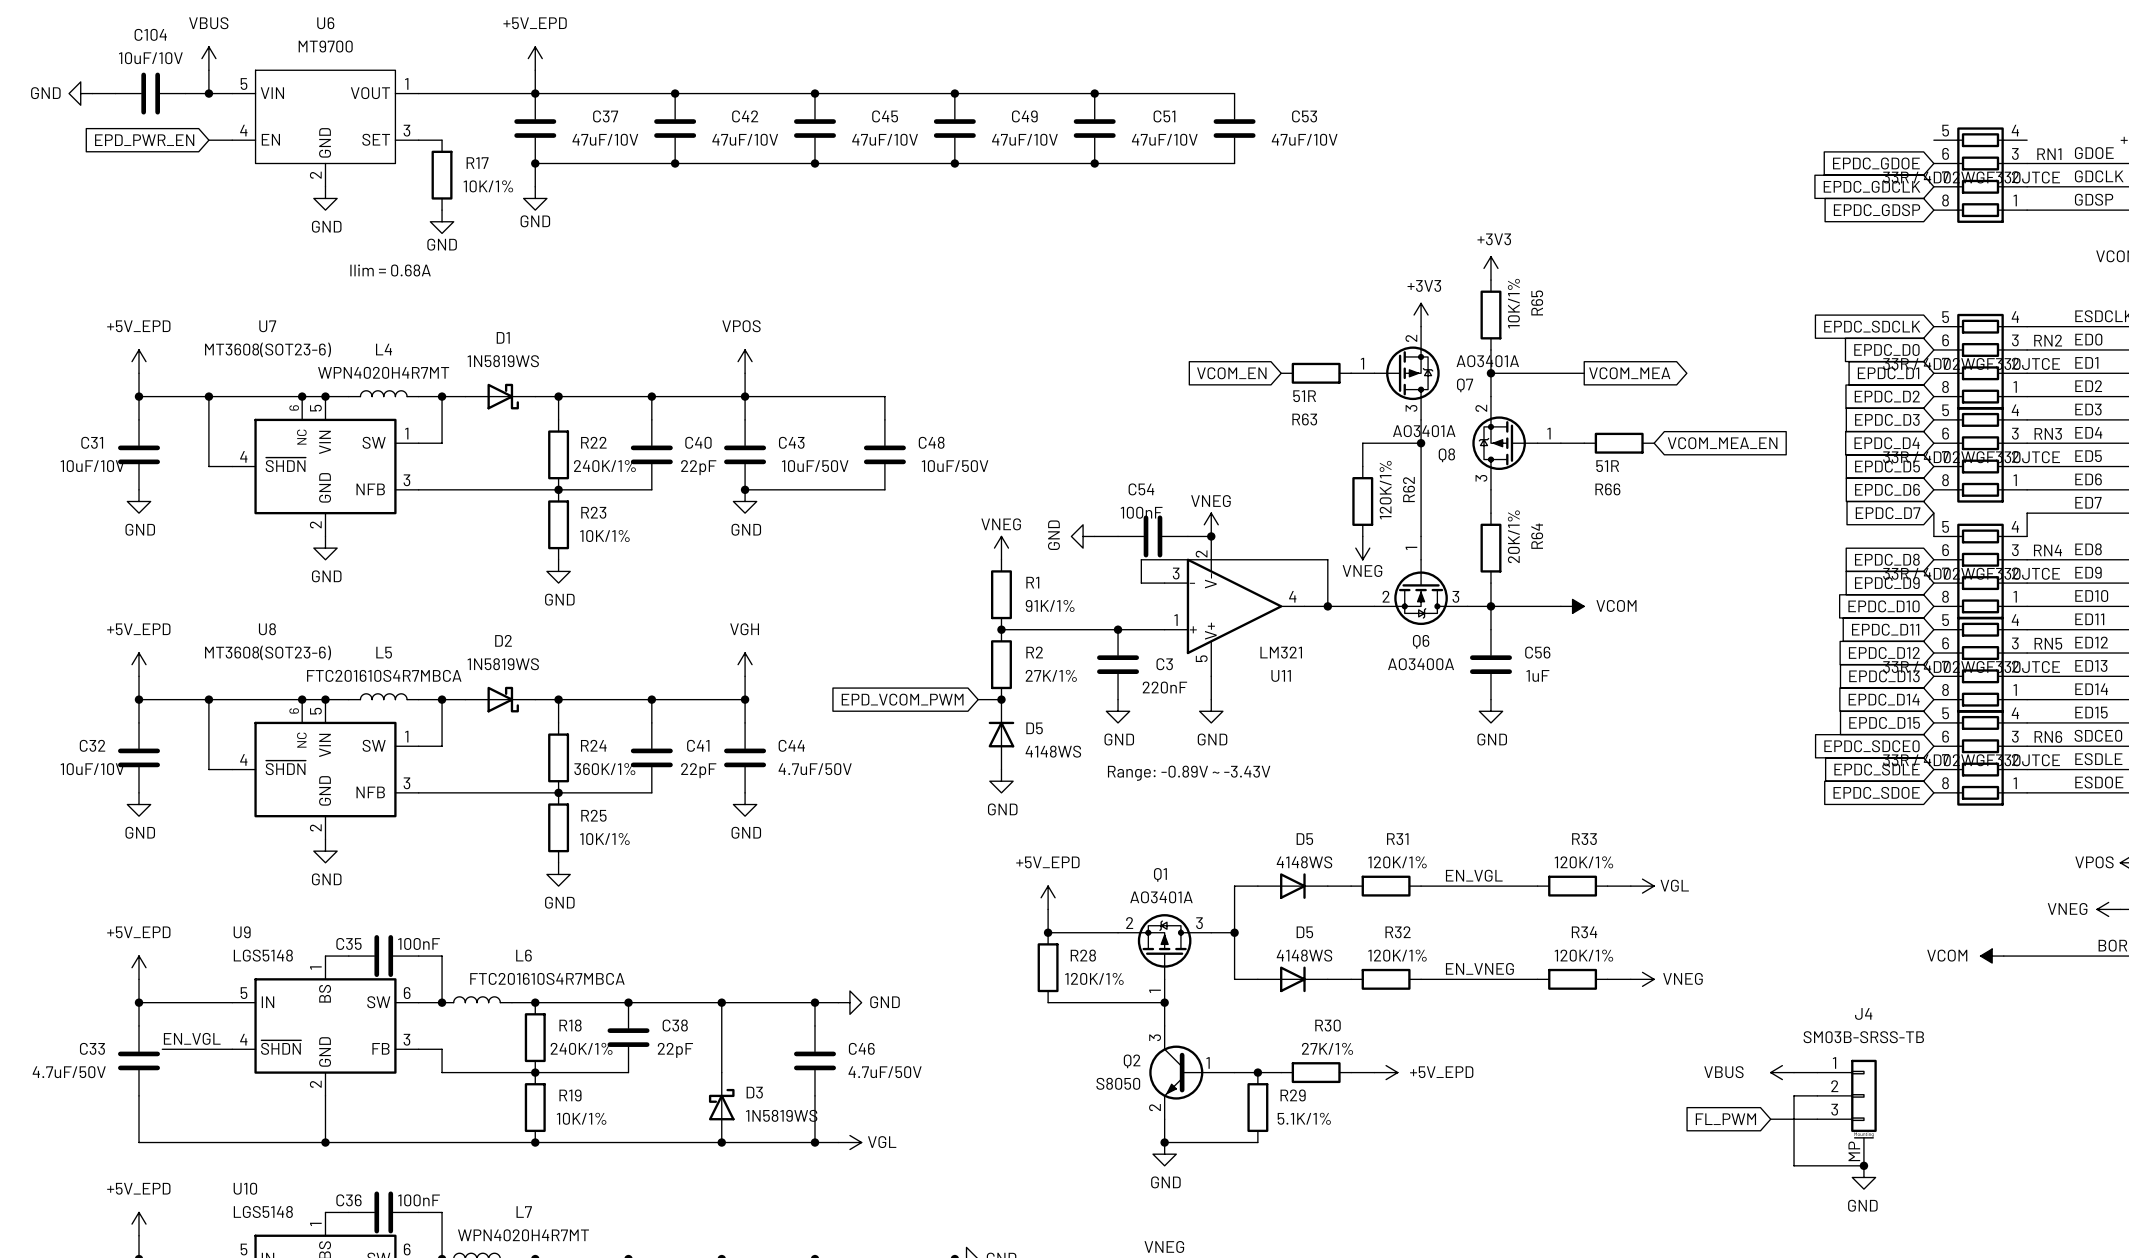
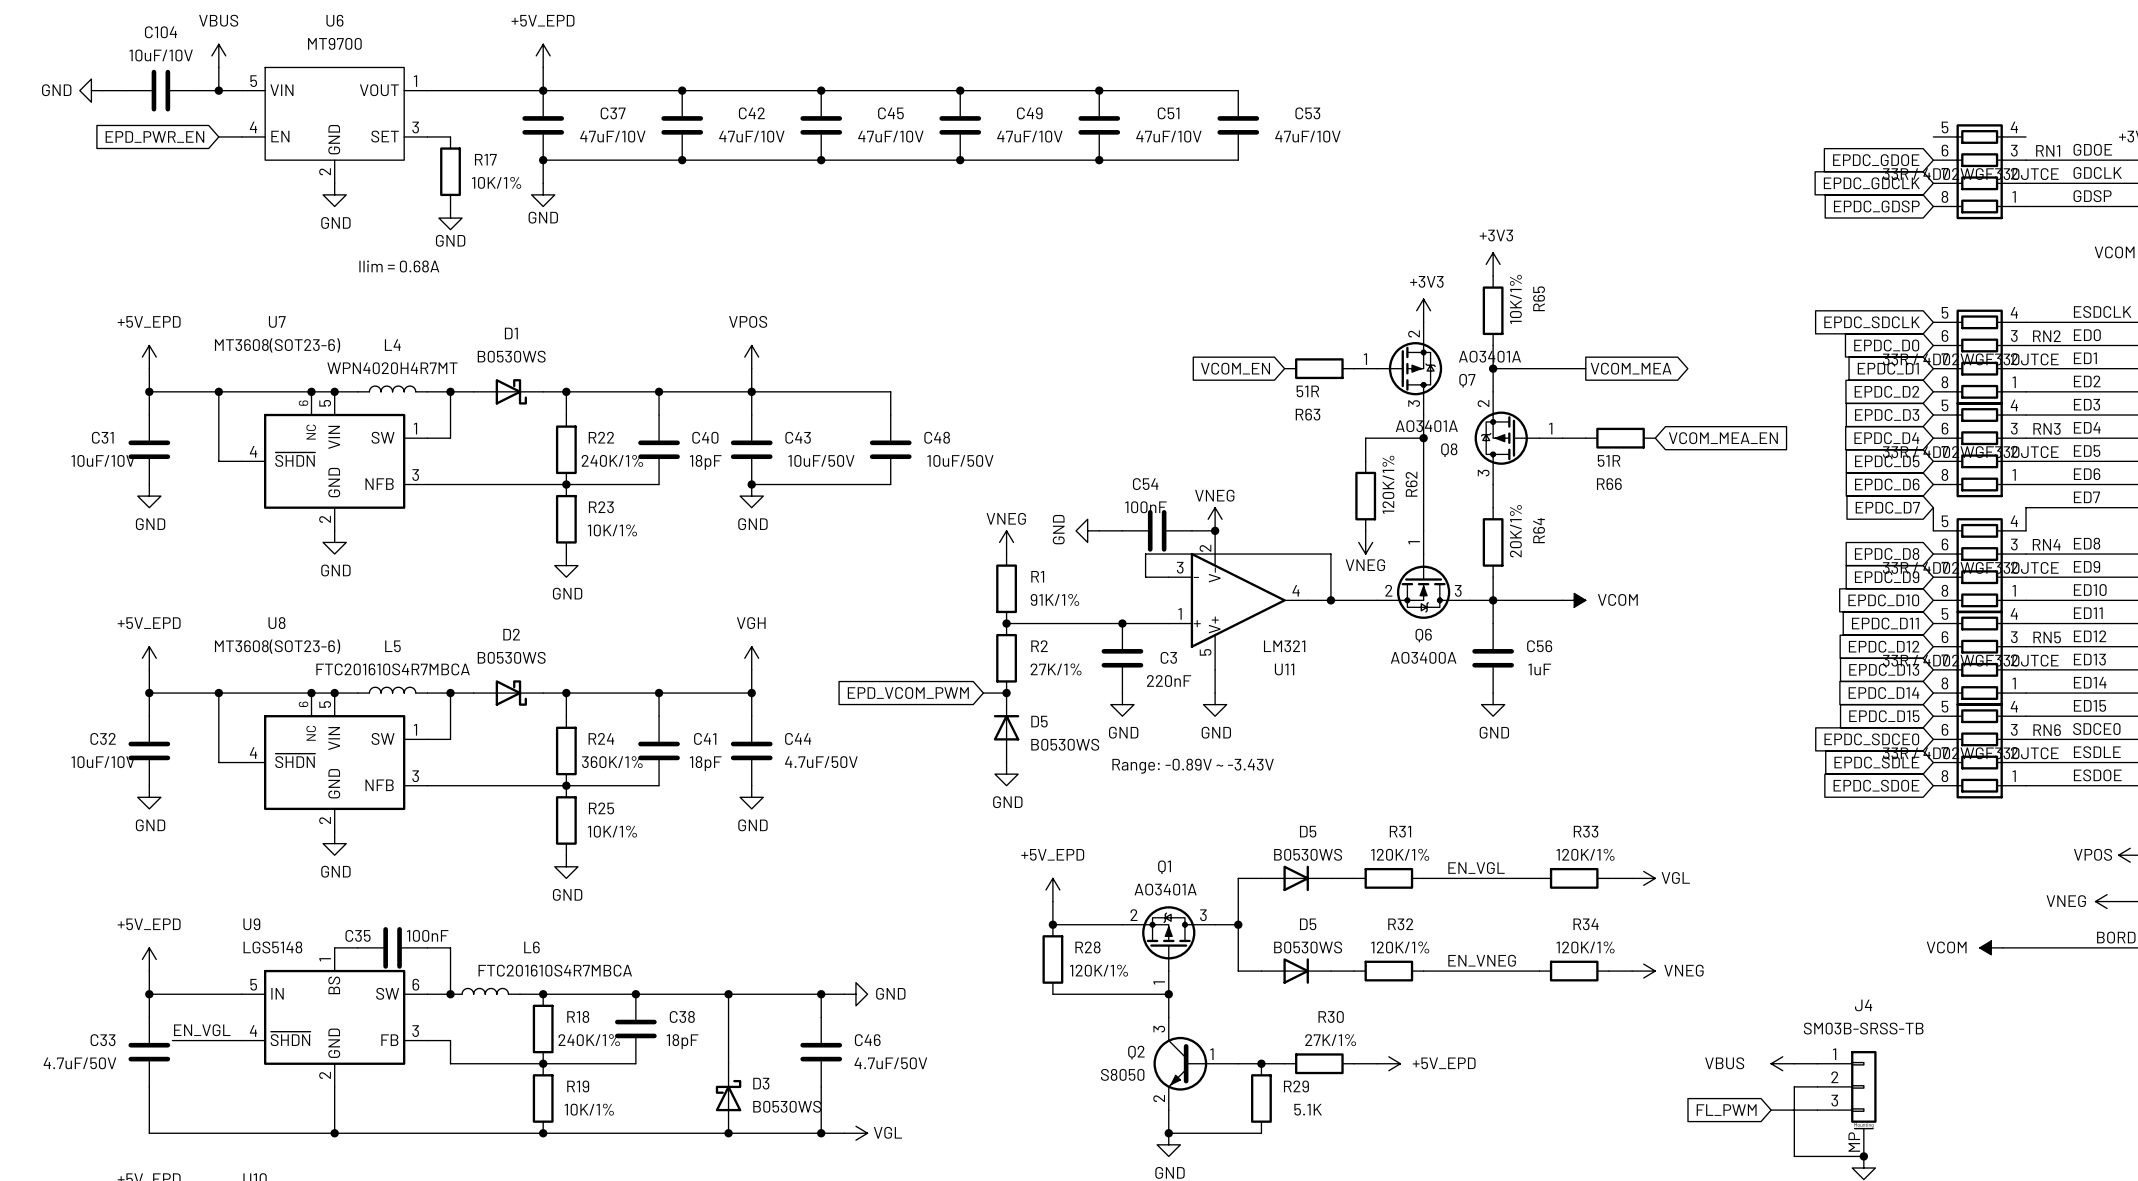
D1 value: 1N5819WS (503, 361) -> B0530WS (511, 356)
C40 value: 22pF (698, 467) -> 18pF (705, 462)
D2 value: 1N5819WS (503, 664) -> B0530WS (511, 657)
D5 value: 4148WS (1053, 751) -> B0530WS (1065, 744)
C41 value: 22pF (698, 770) -> 18pF (705, 763)
D5 value: 4148WS (1304, 862) -> B0530WS (1308, 854)
D5 value: 4148WS (1304, 955) -> B0530WS (1308, 947)
C38 value: 22pF (675, 1050) -> 18pF (682, 1041)
D3 value: 1N5819WS (781, 1115) -> B0530WS (787, 1106)
R29 value: 5.1K/1% (1304, 1118) -> 5.1K (1308, 1109)

